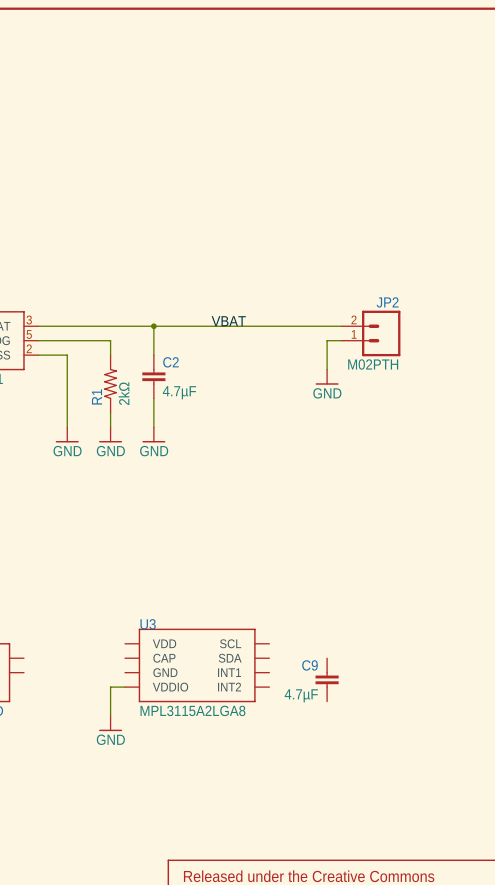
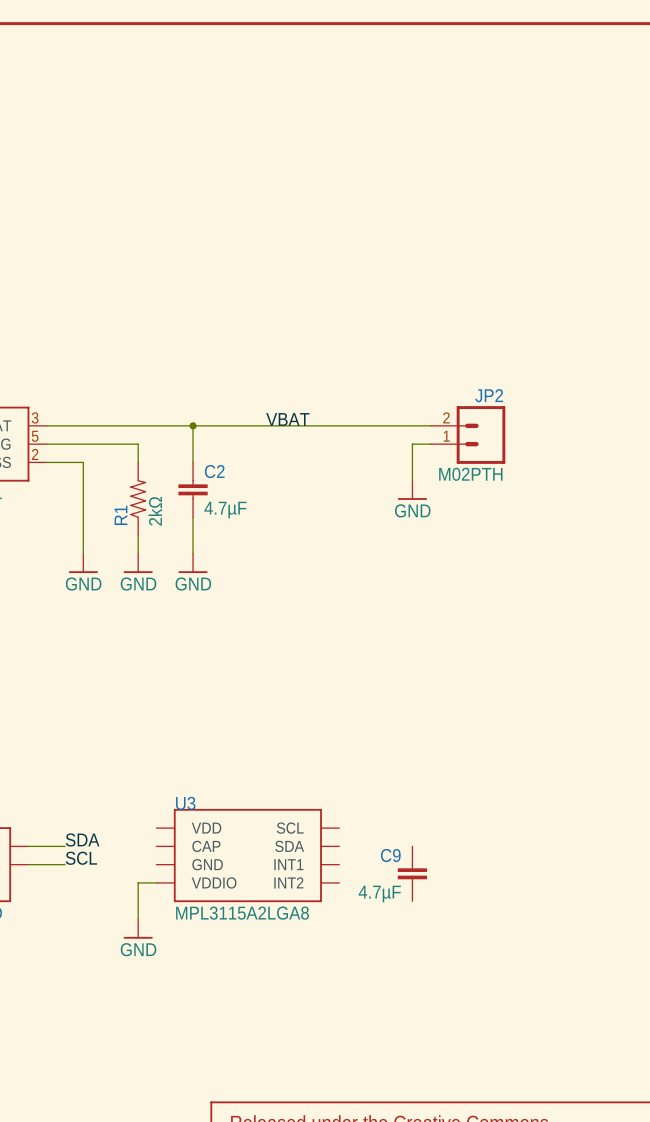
label: none -> SDA (82, 839)
wire: none -> (28, 846) (65, 846)
label: none -> SCL (81, 858)
wire: none -> (28, 864) (65, 864)

